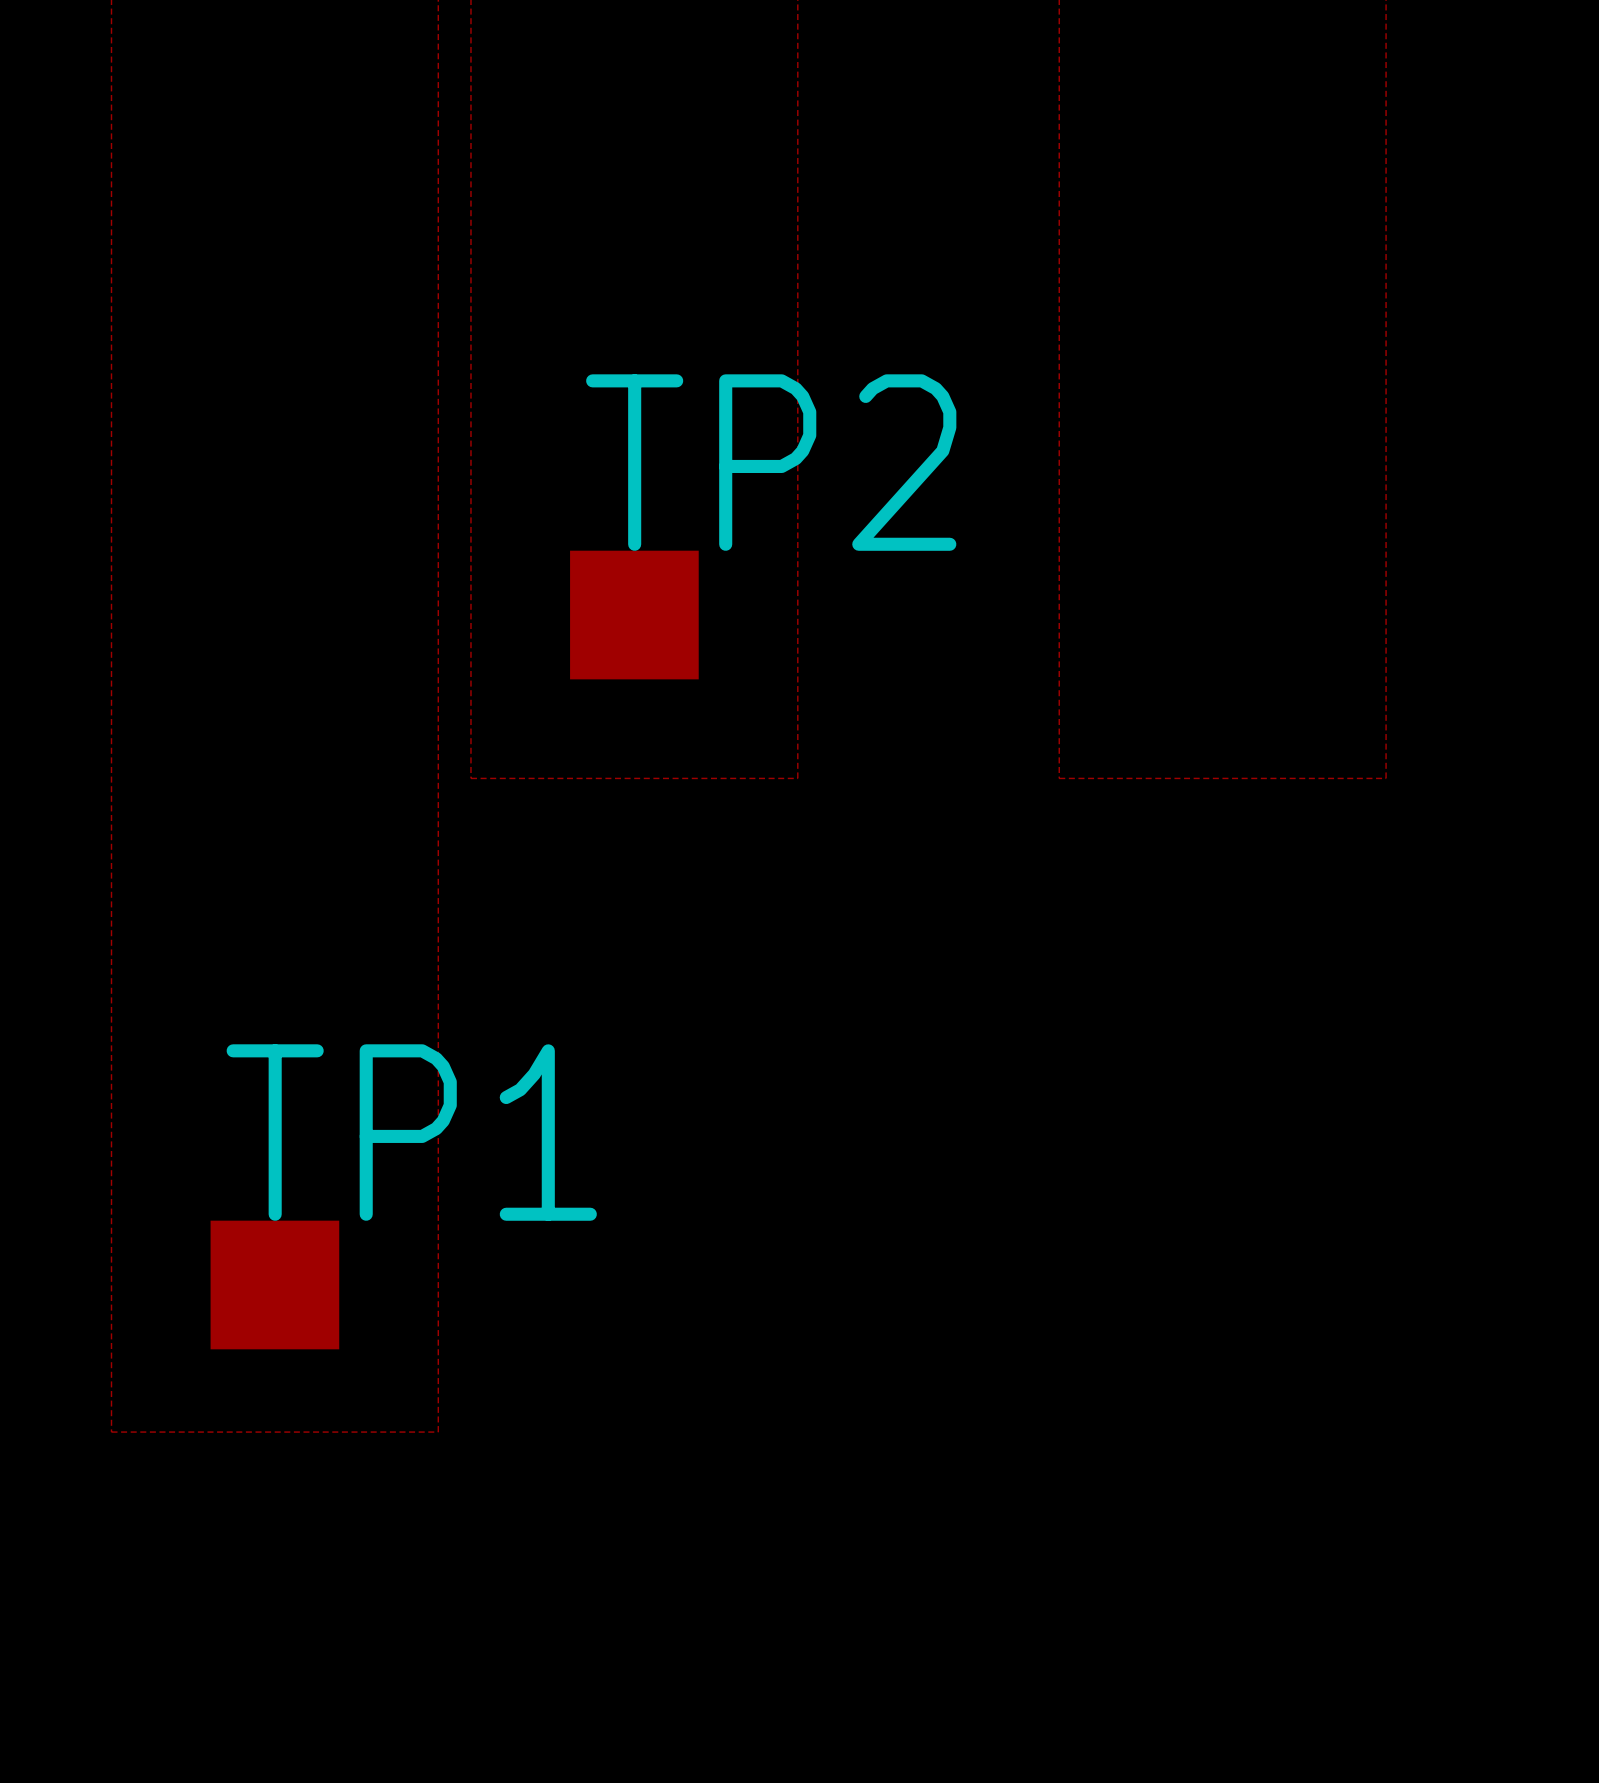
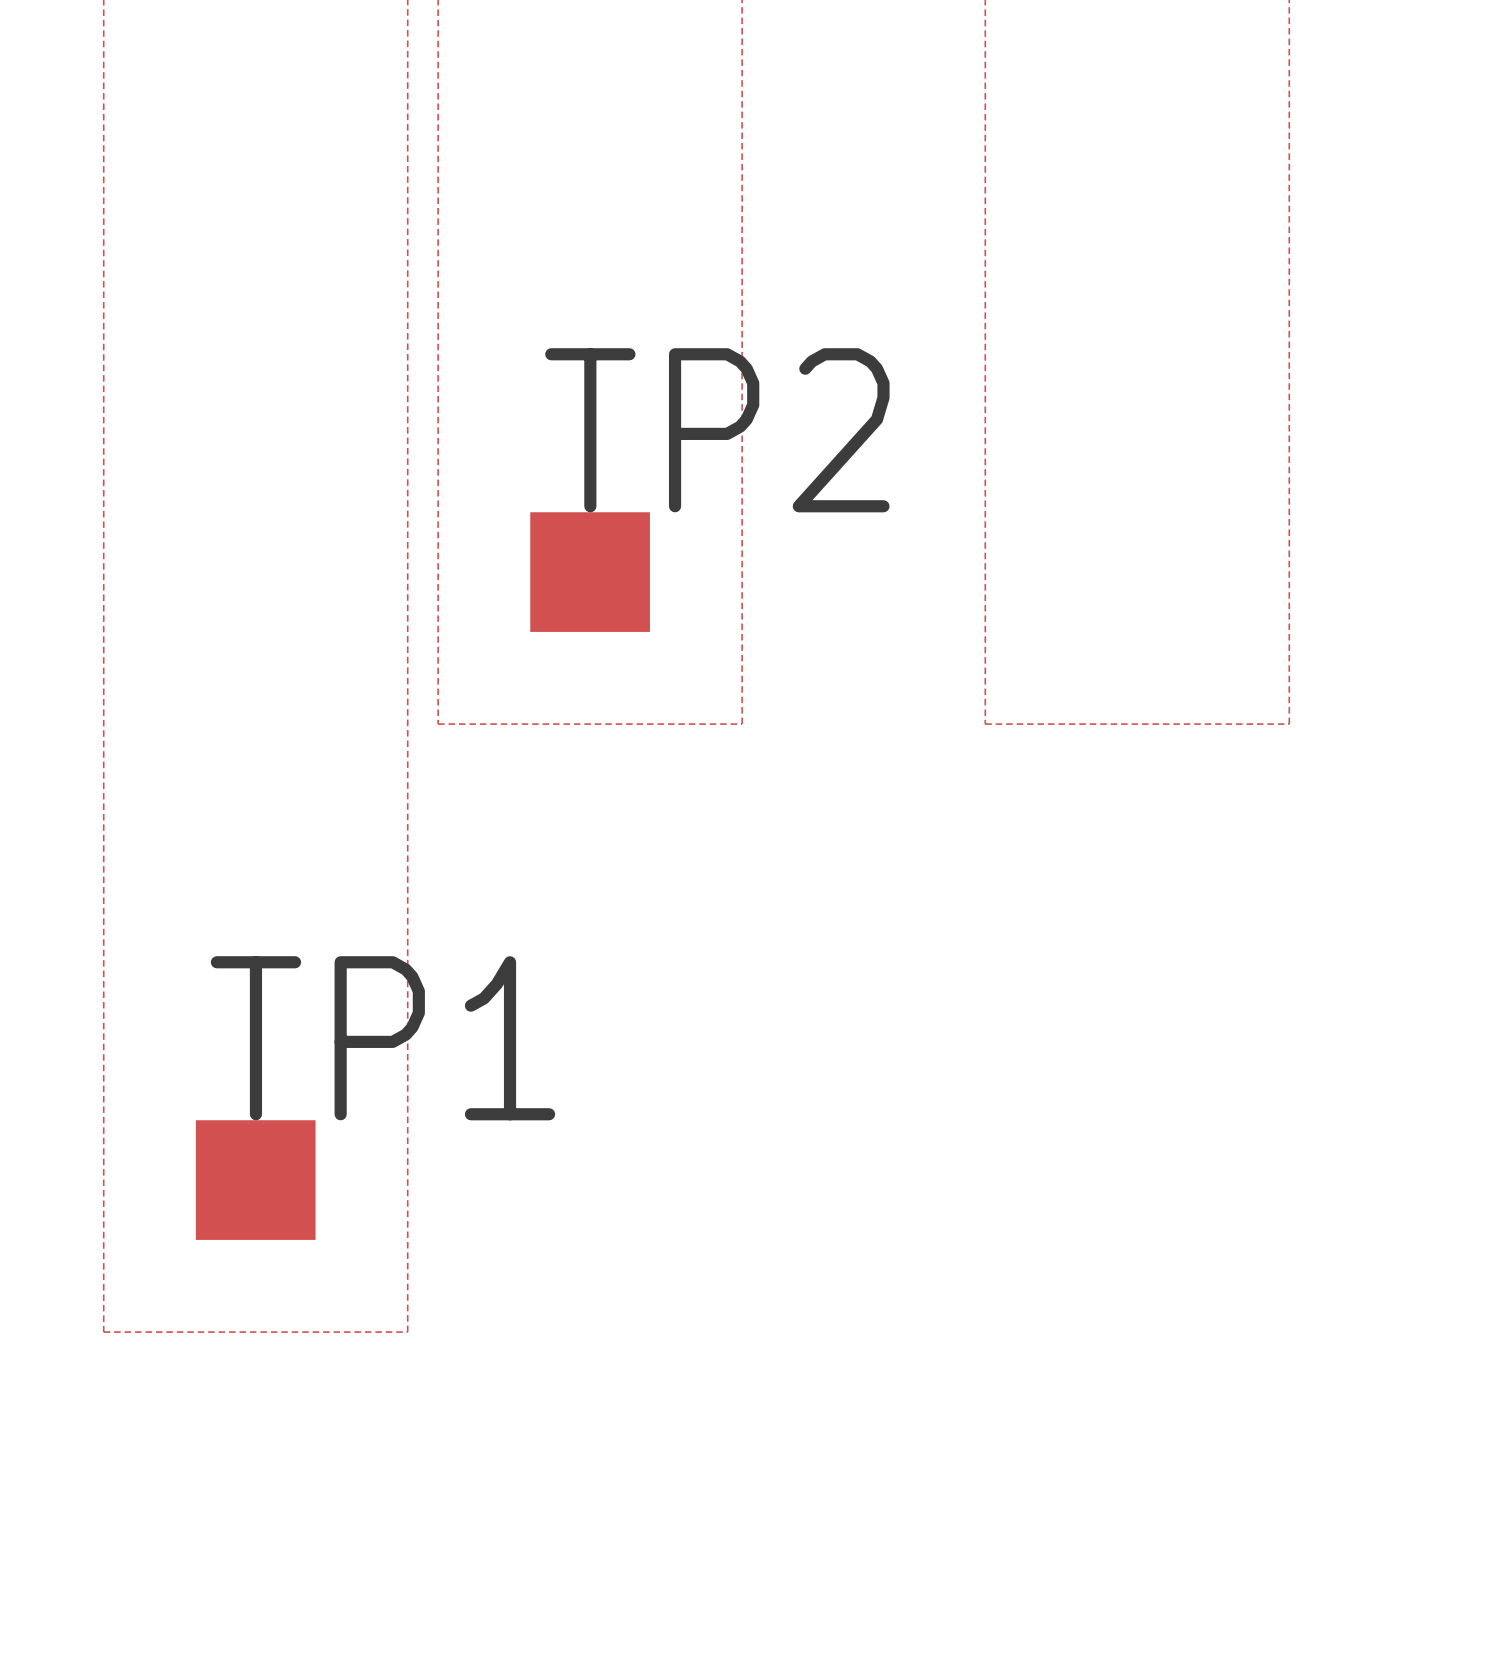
TP1 position: (274, 1284) -> (255, 1180)

